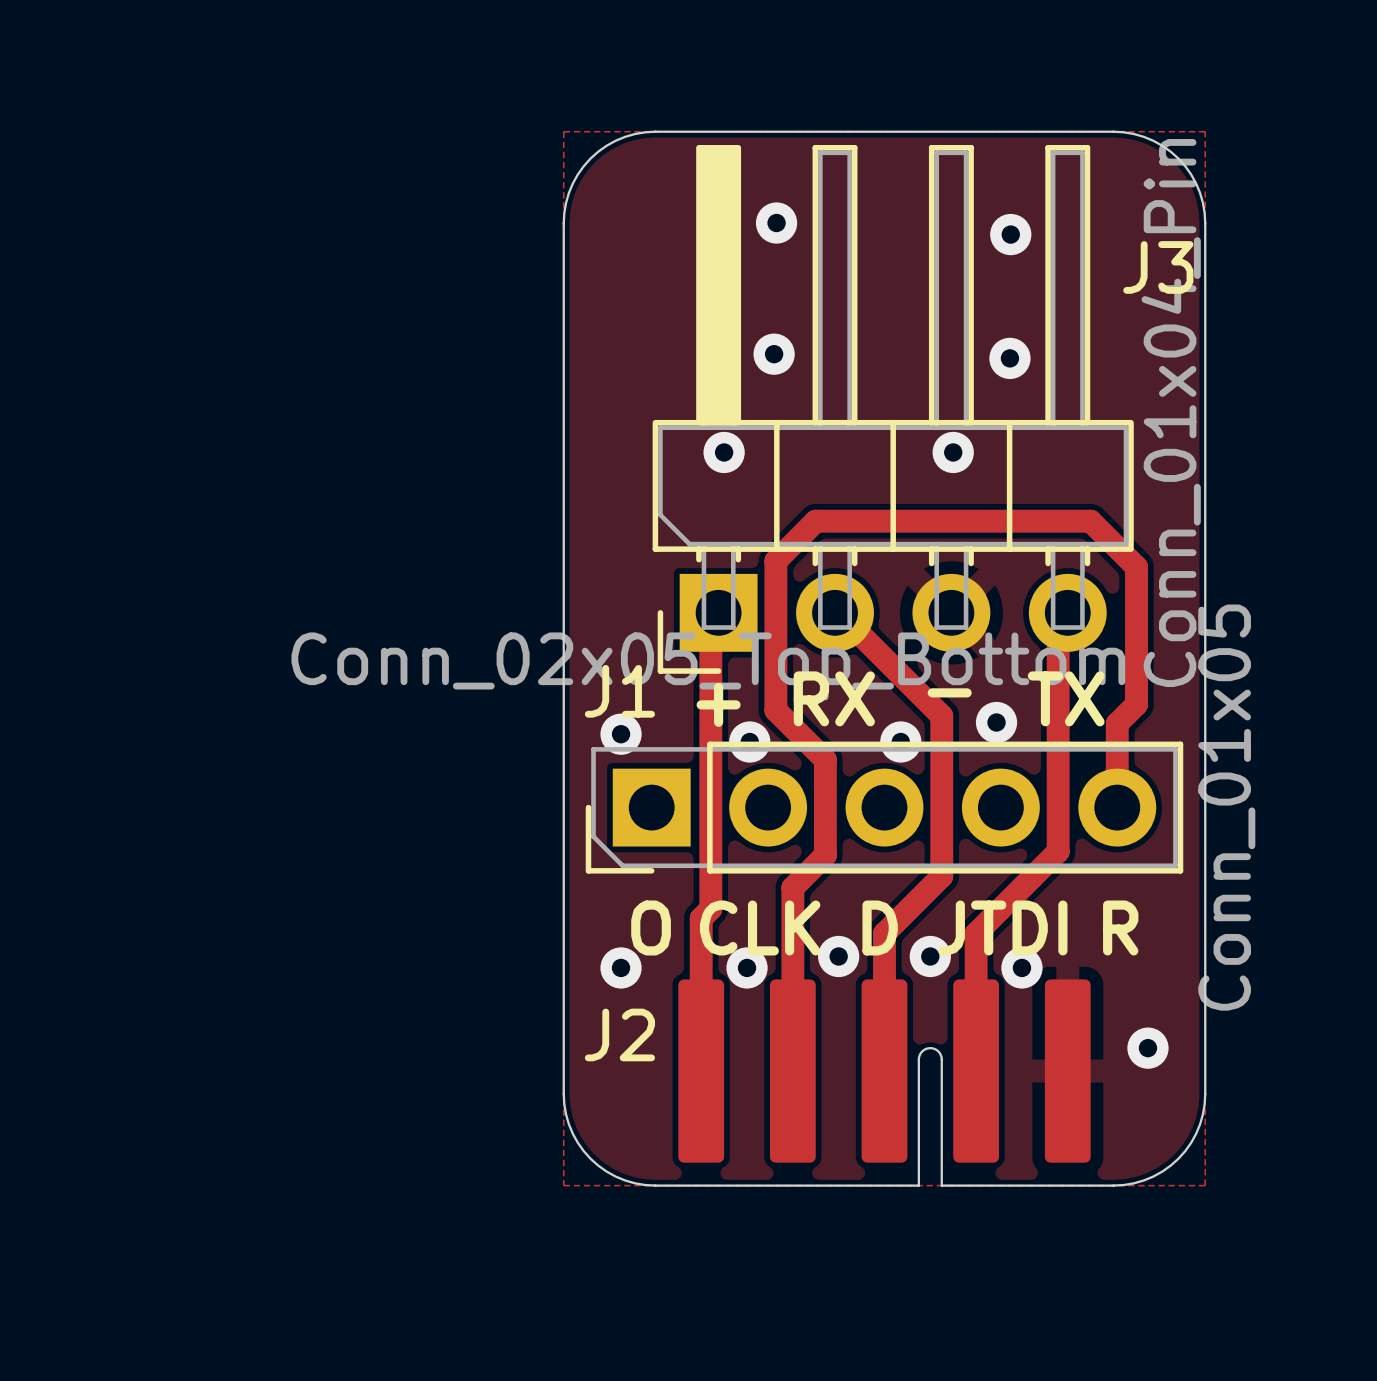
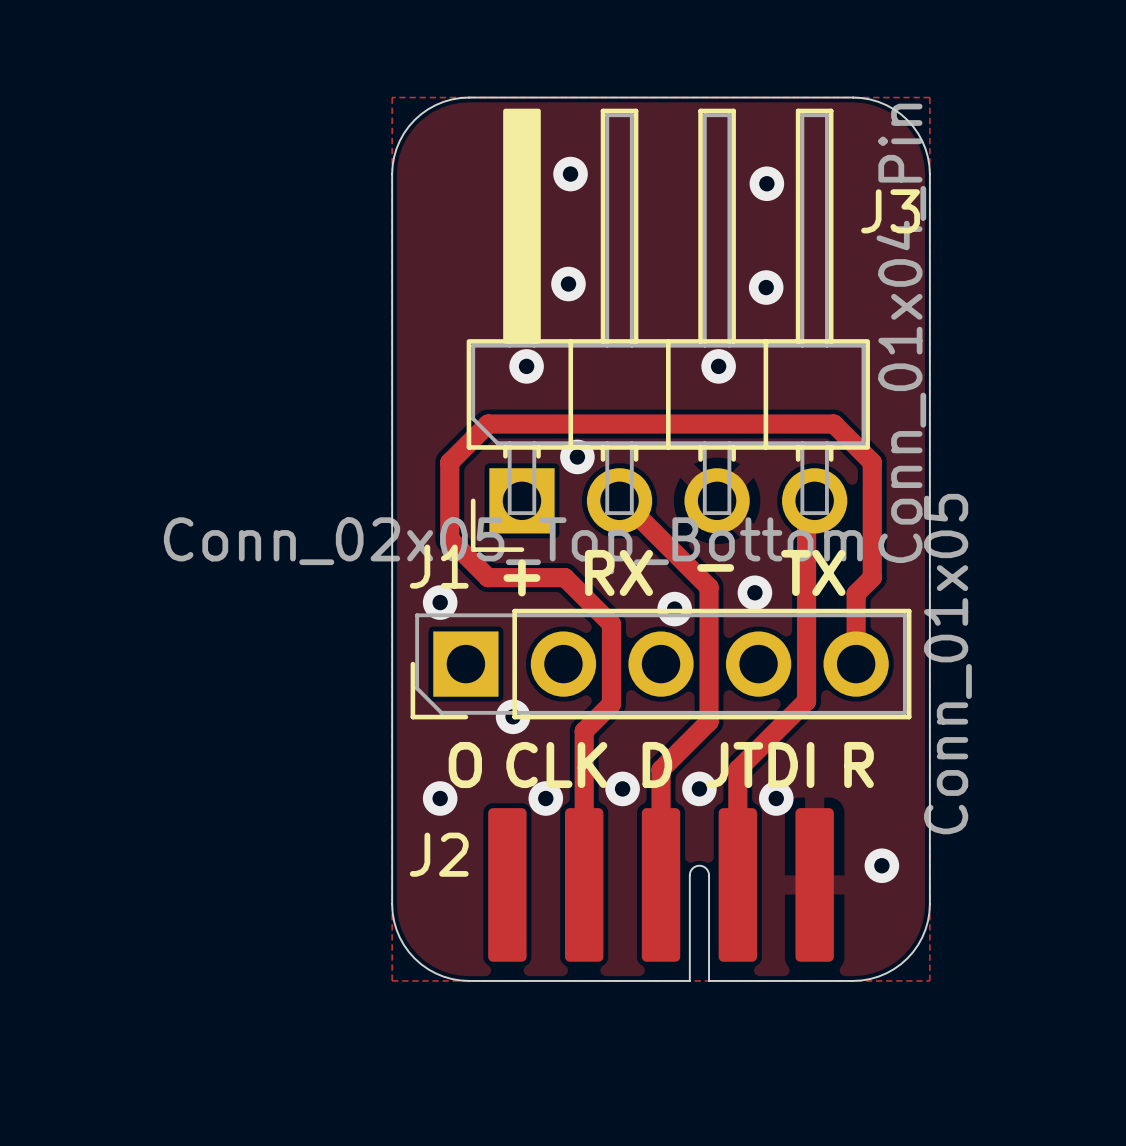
track: (815, 521) (775, 561) (775, 710) -> (603, 424) (488, 424) (449, 462) (449, 539) (488, 577) (564, 577) (569, 582)
via: none -> (577, 456)
track: (718, 612) (710, 620) (710, 908) (701, 918) (701, 1071) -> none
via: (749, 742) -> none
via: none -> (513, 716)

